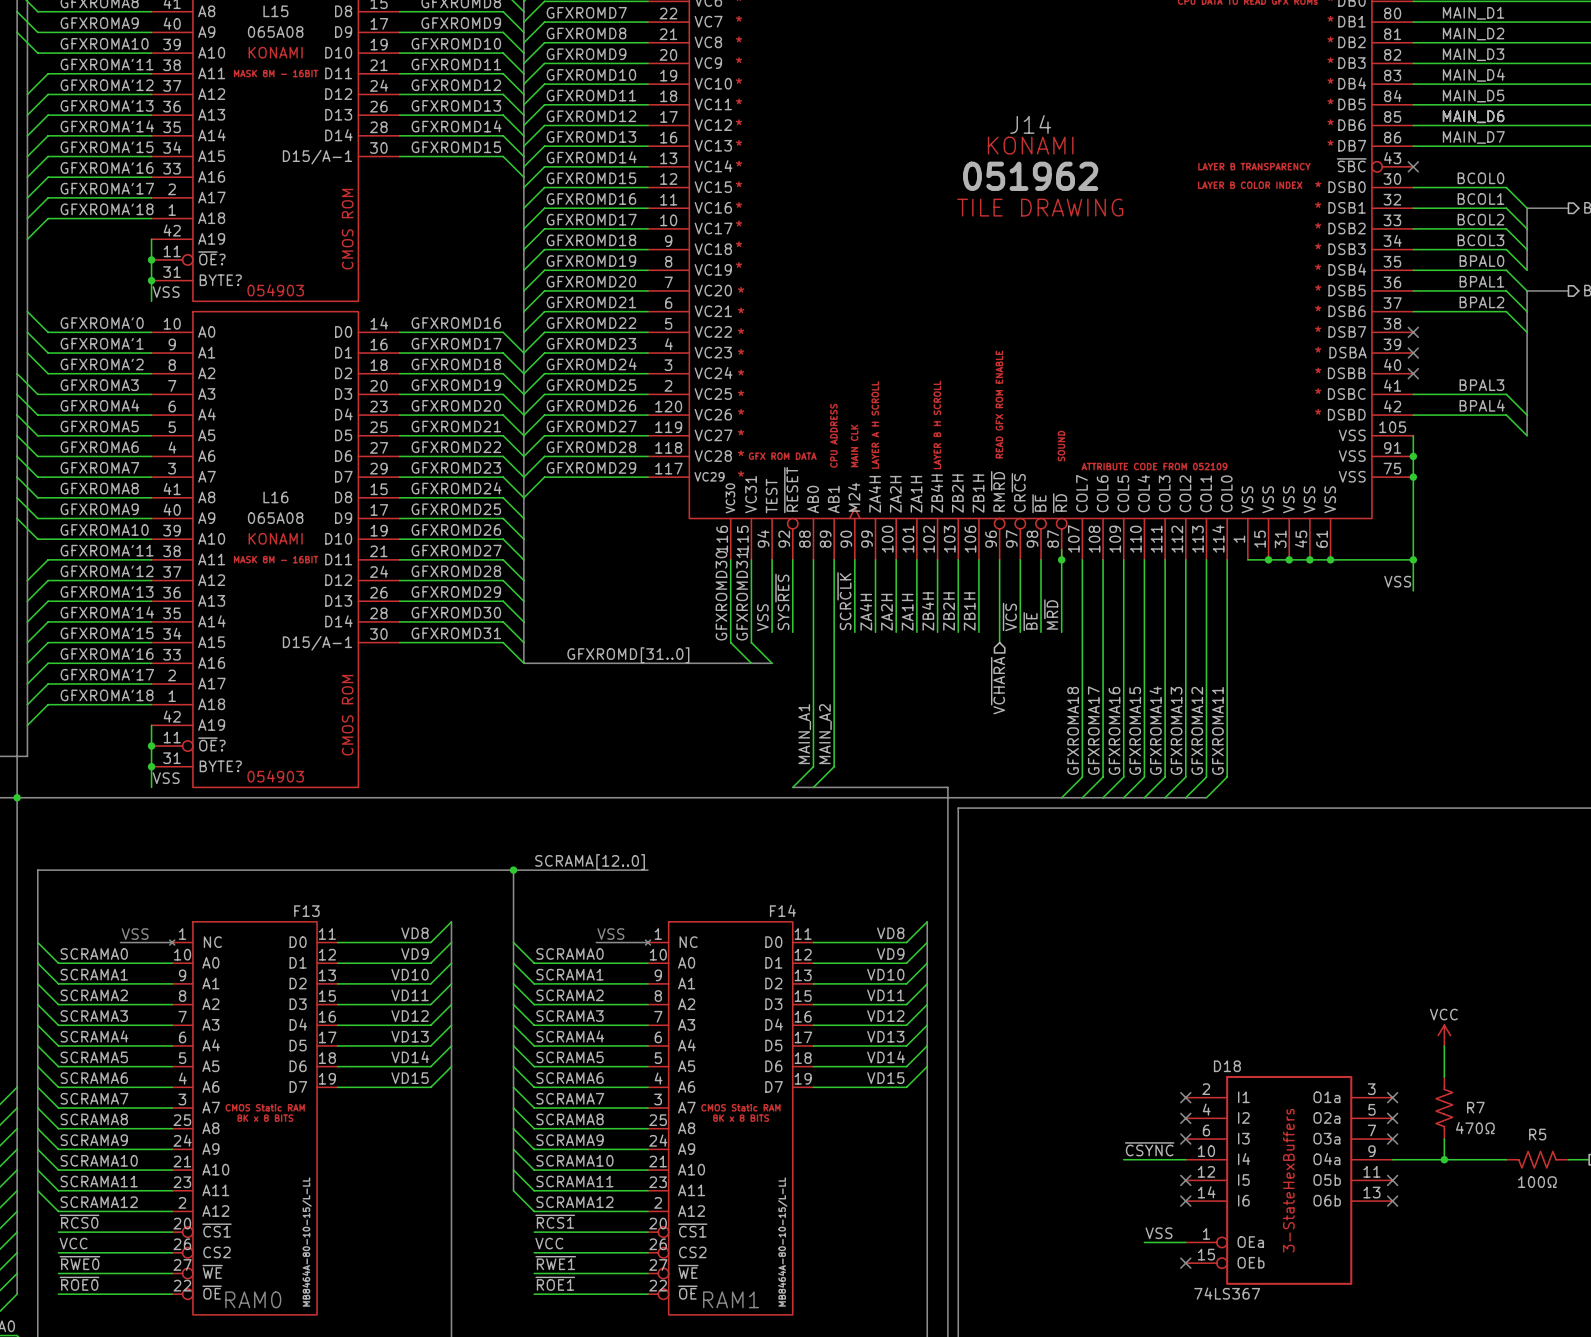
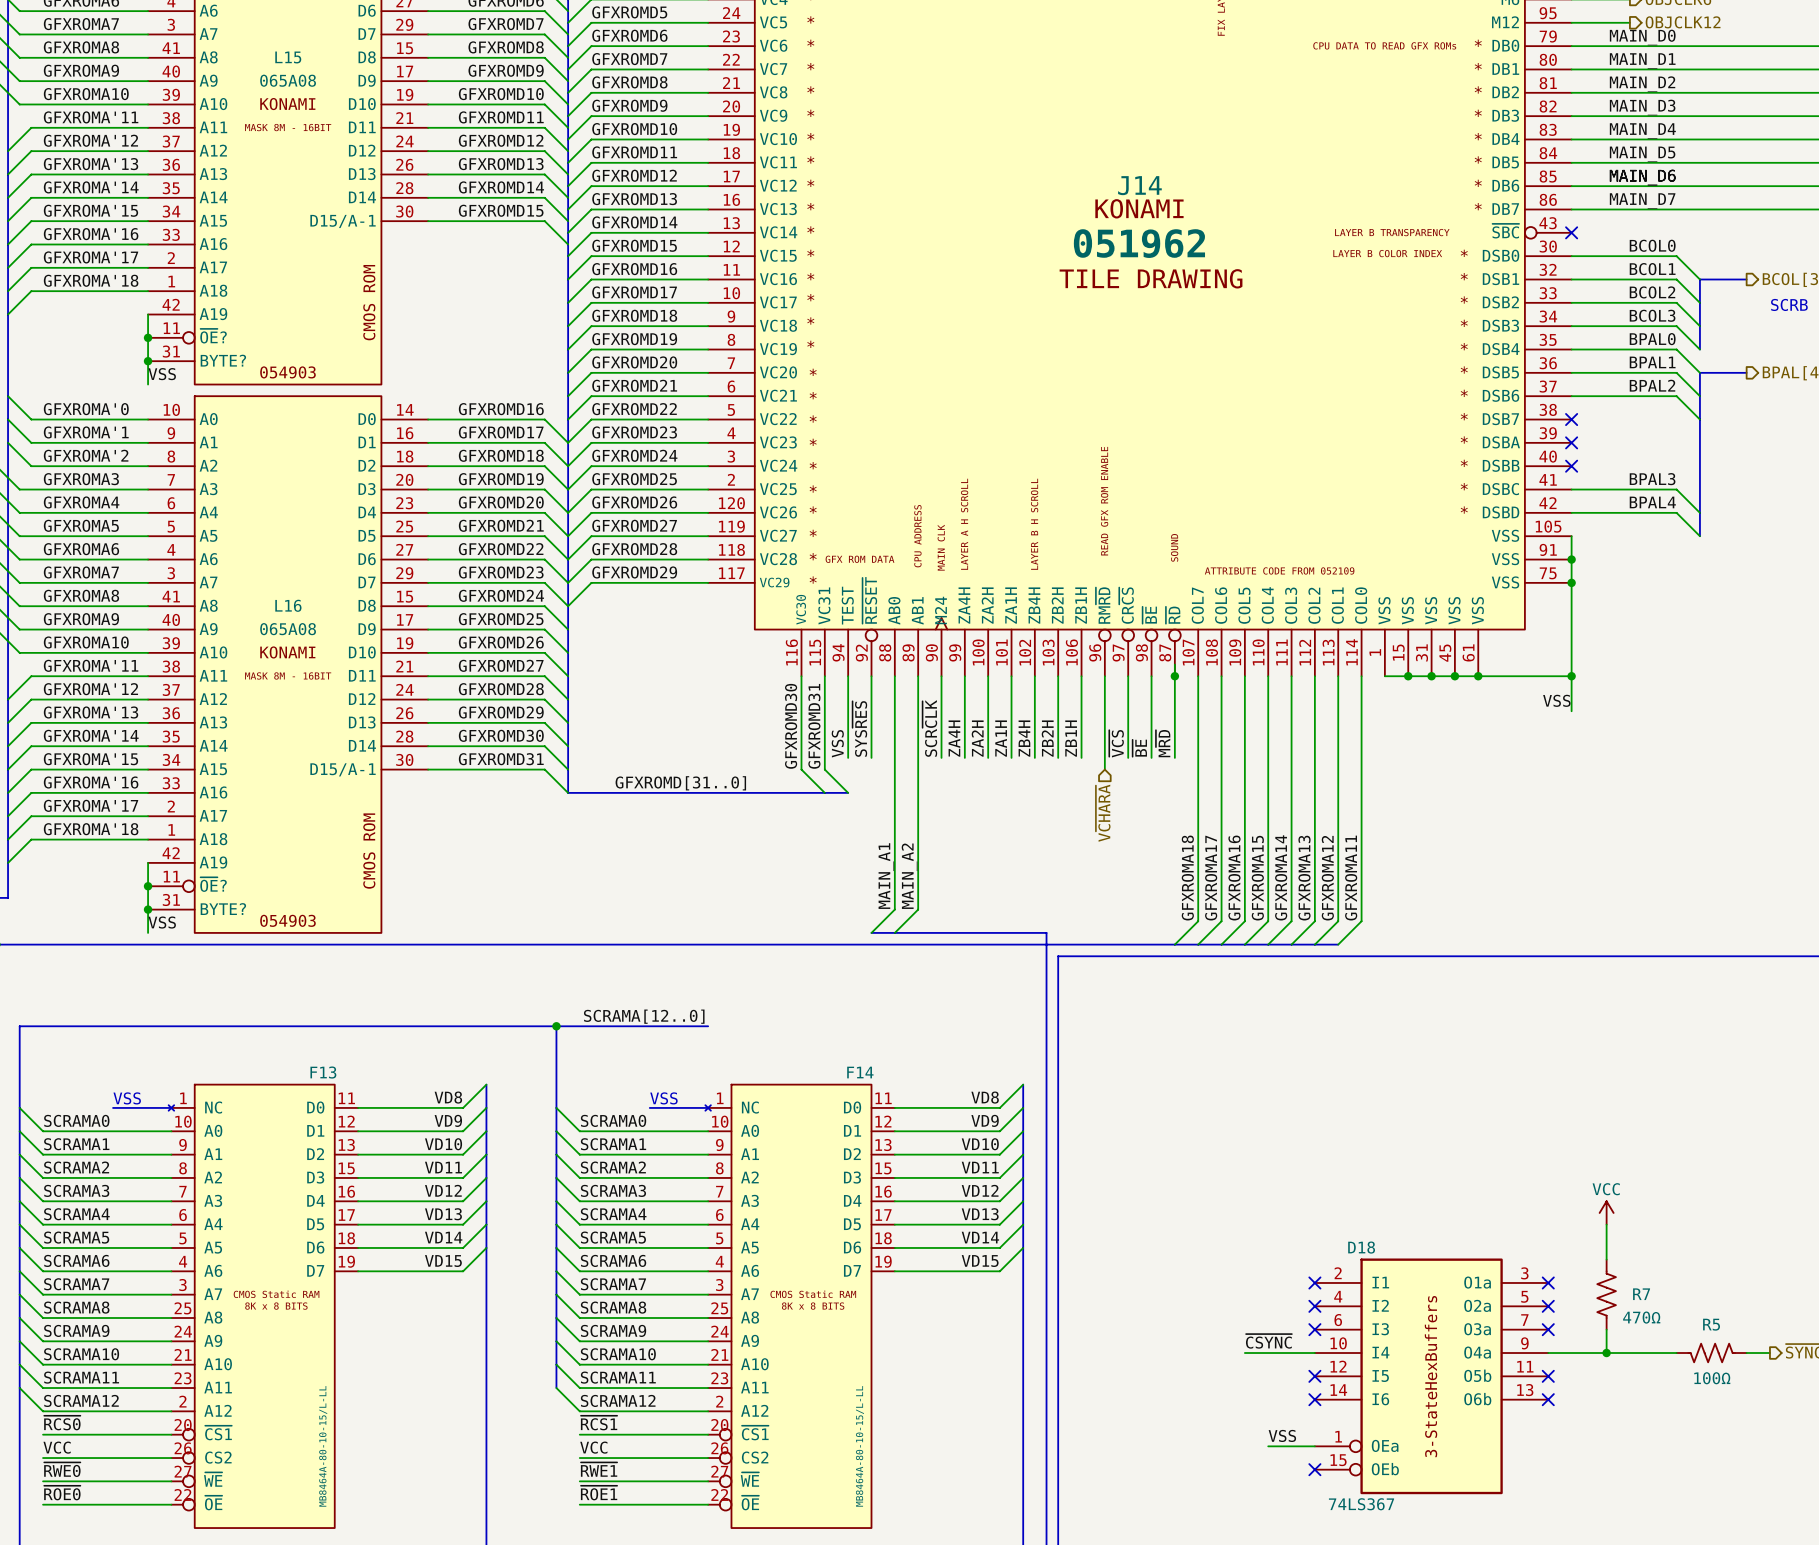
text: RAM0 (253, 1299) -> none
text: RAM1 (731, 1299) -> none

